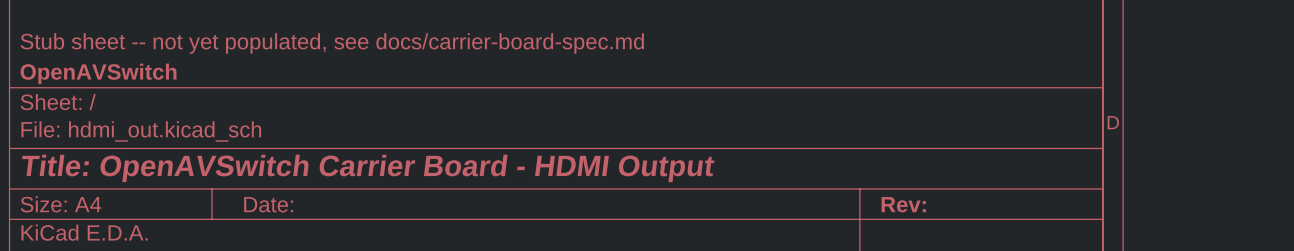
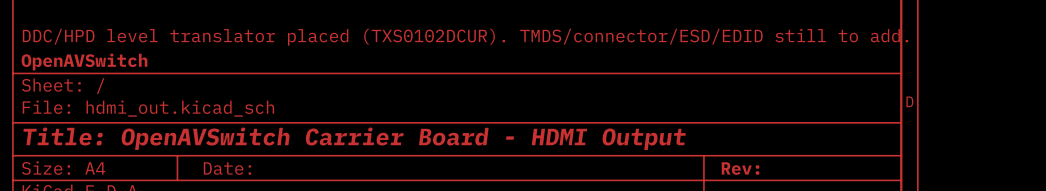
title block: Stub sheet -- not yet populated, see docs/carrier-board-spec.md (332, 43) -> DDC/HPD level translator placed (TXS0102DCUR). TMDS/connector/ESD/EDID still to add. (465, 37)

